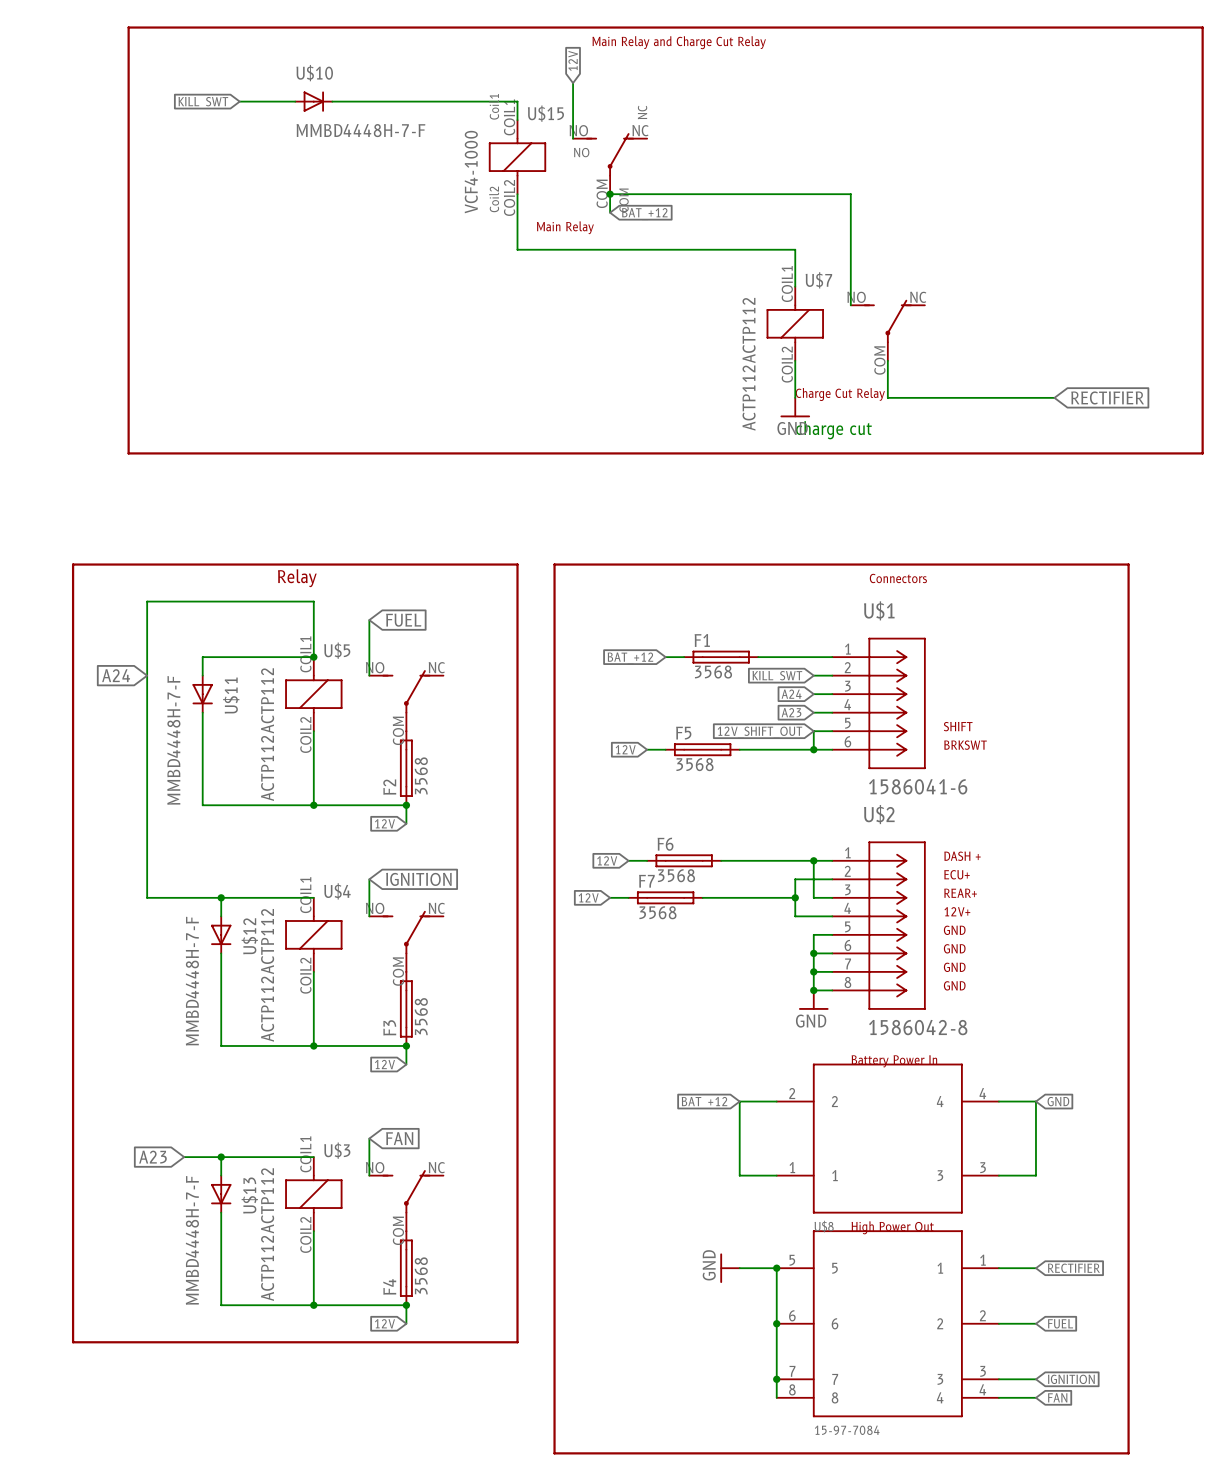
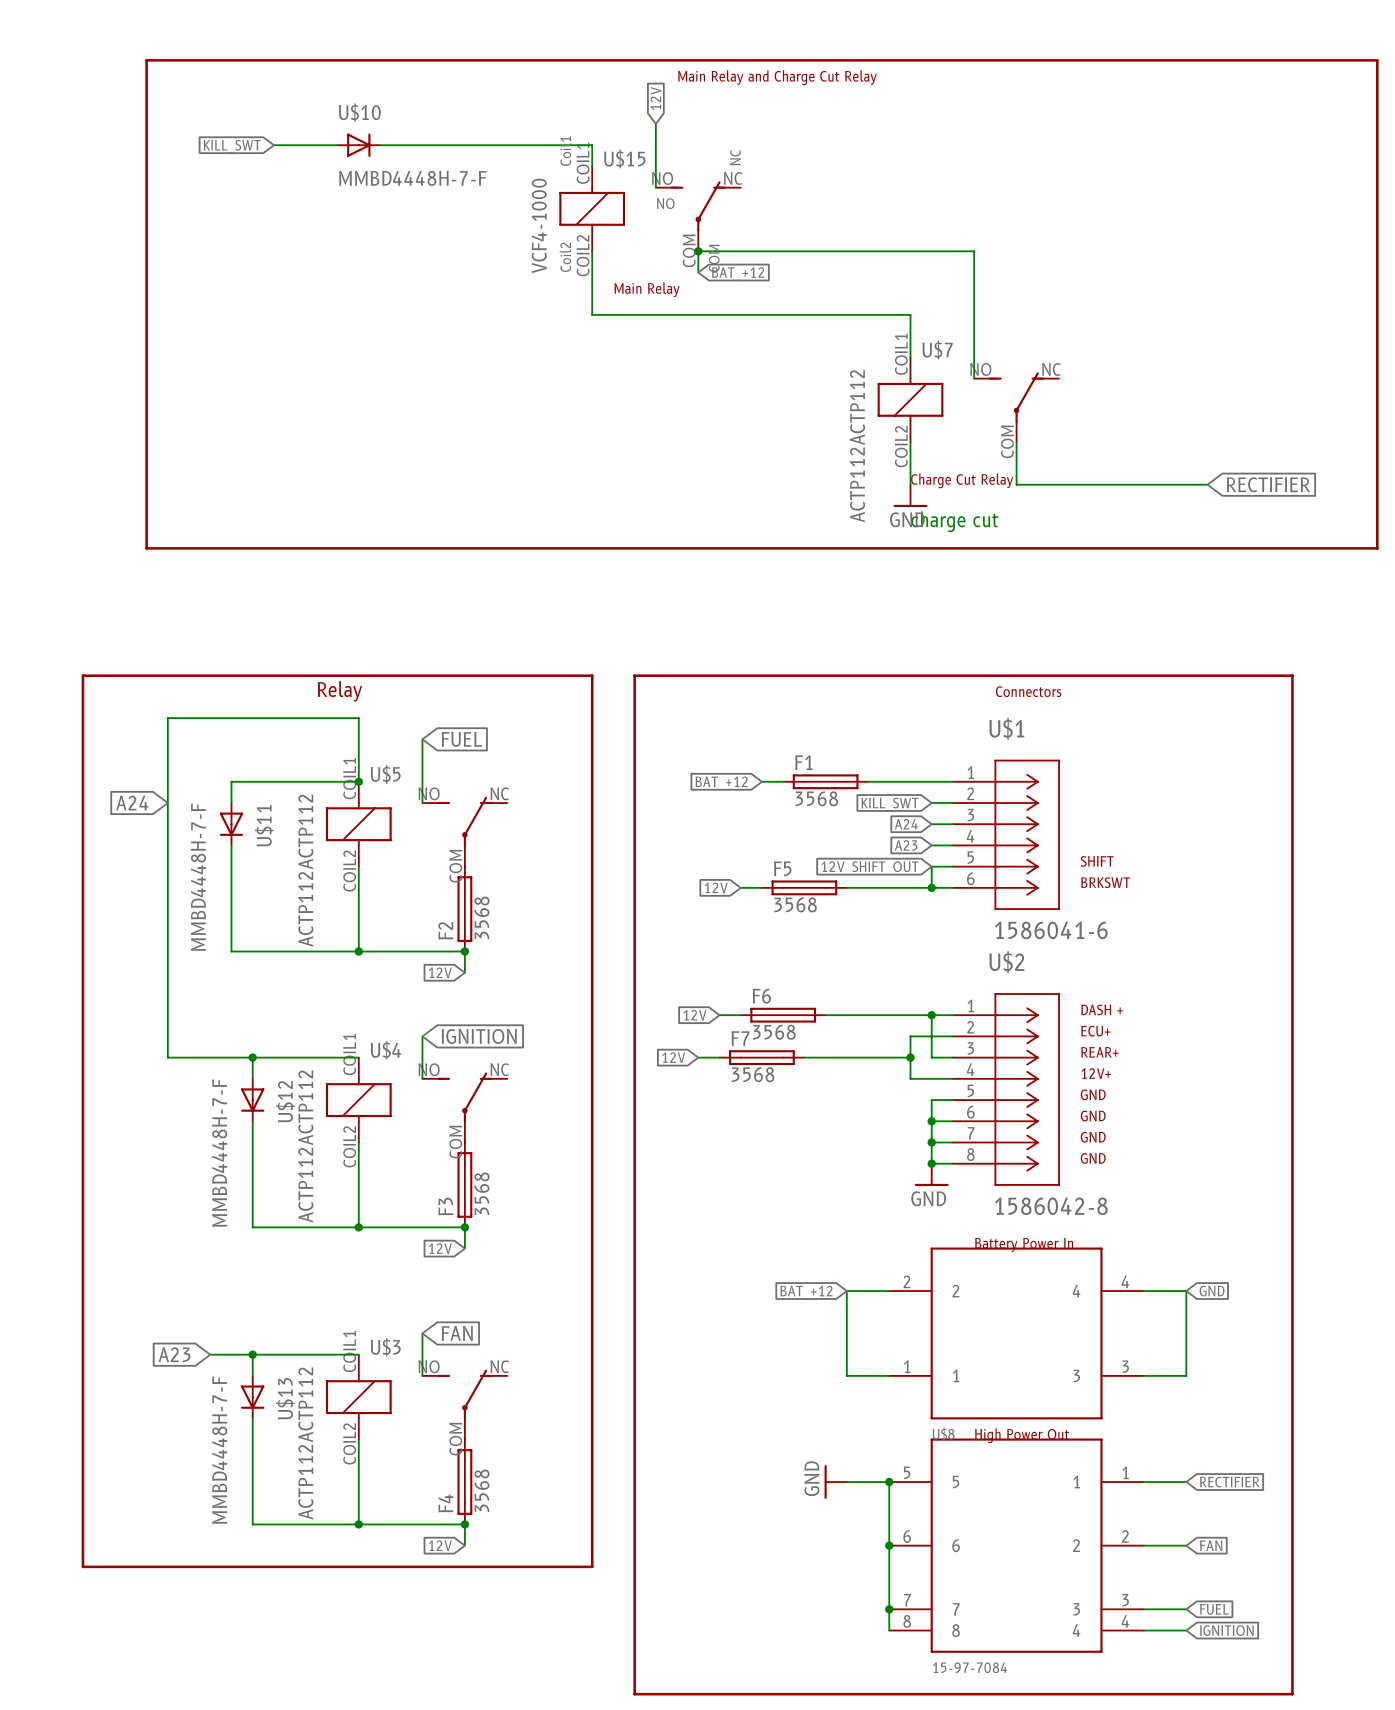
global label: FUEL (1060, 1323) -> FAN (1211, 1545)
global label: IGNITION (1071, 1379) -> FUEL (1214, 1609)
global label: FAN (1057, 1397) -> IGNITION (1226, 1630)

